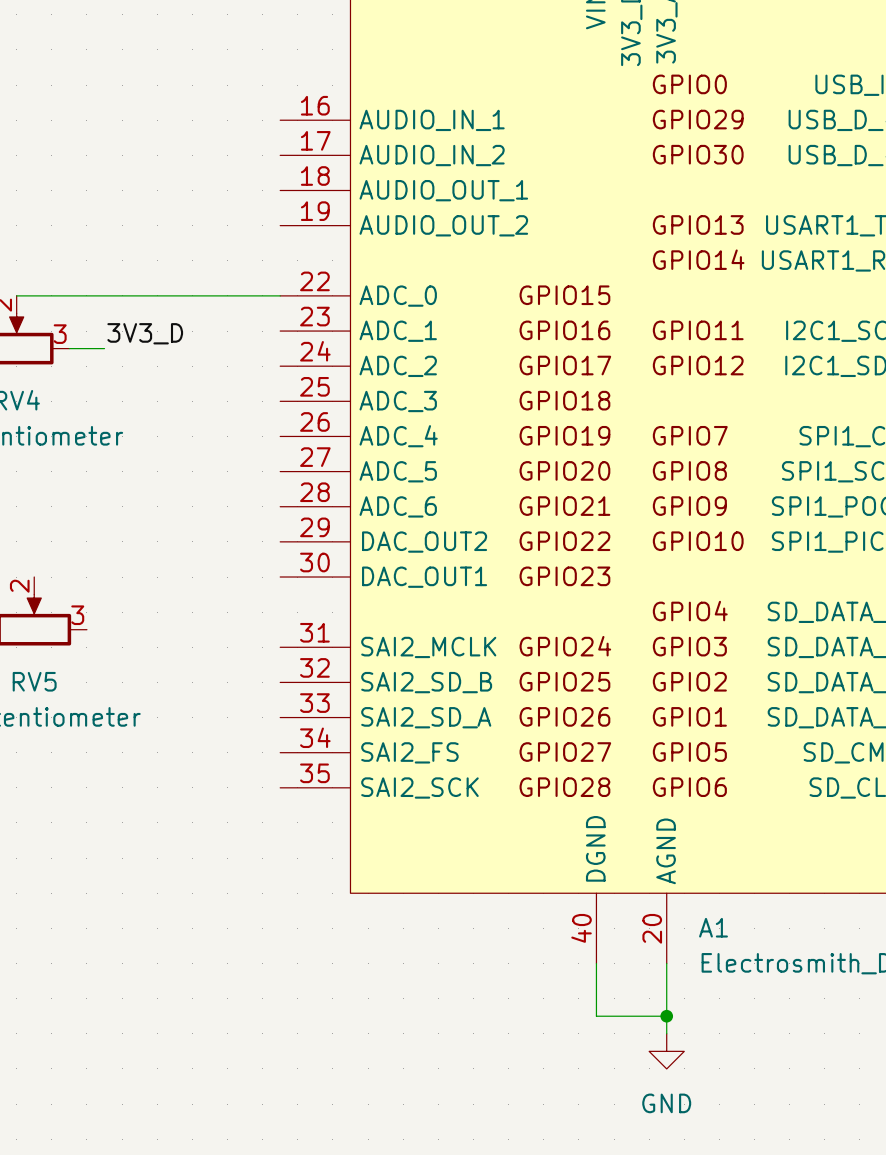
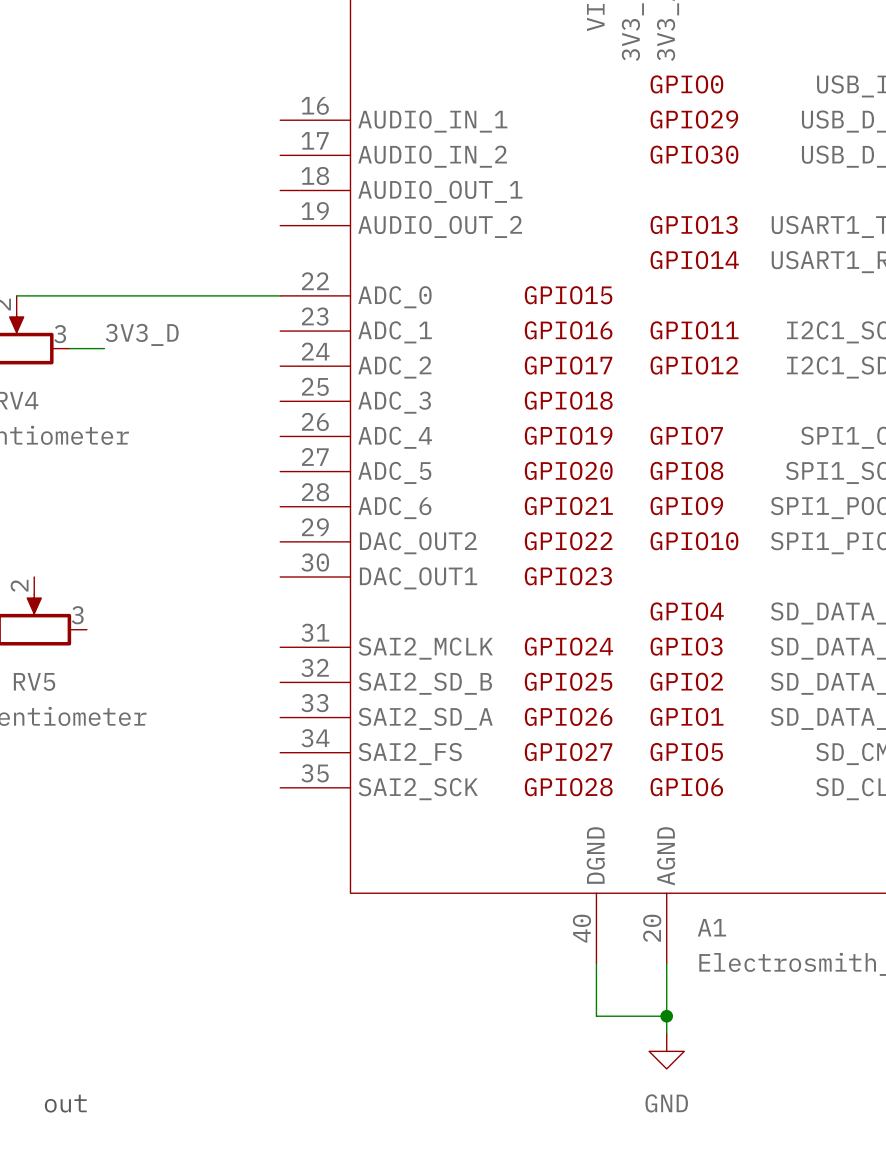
text: none -> out (65, 1103)

